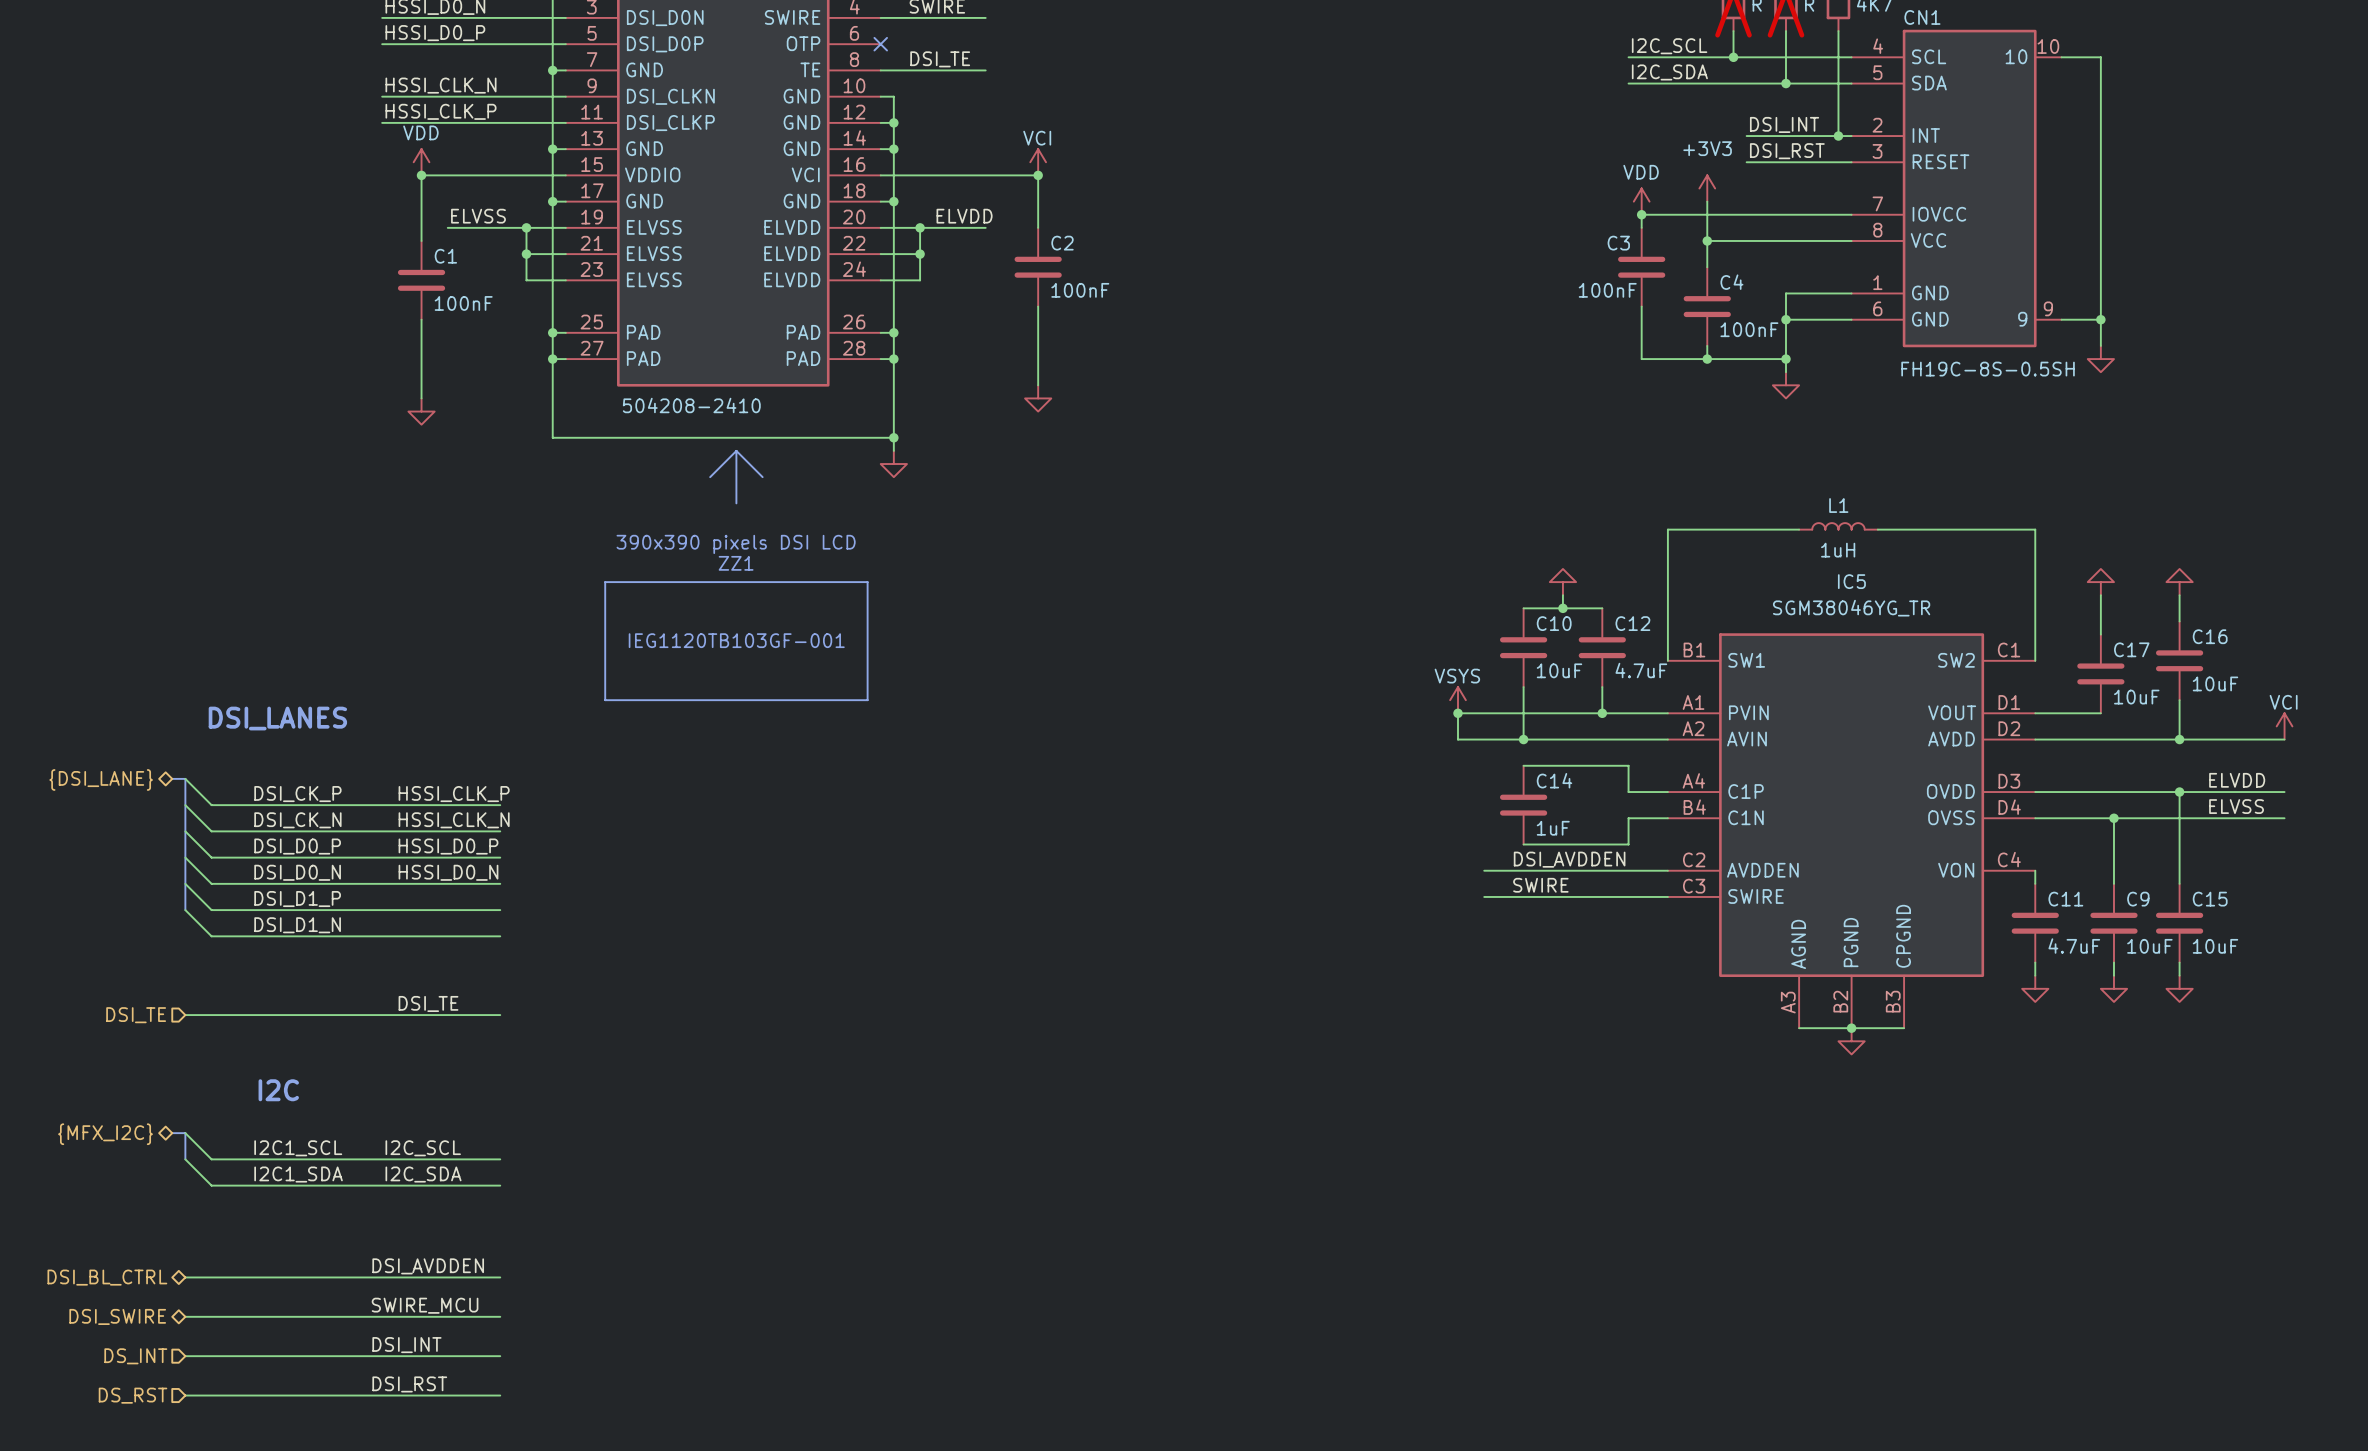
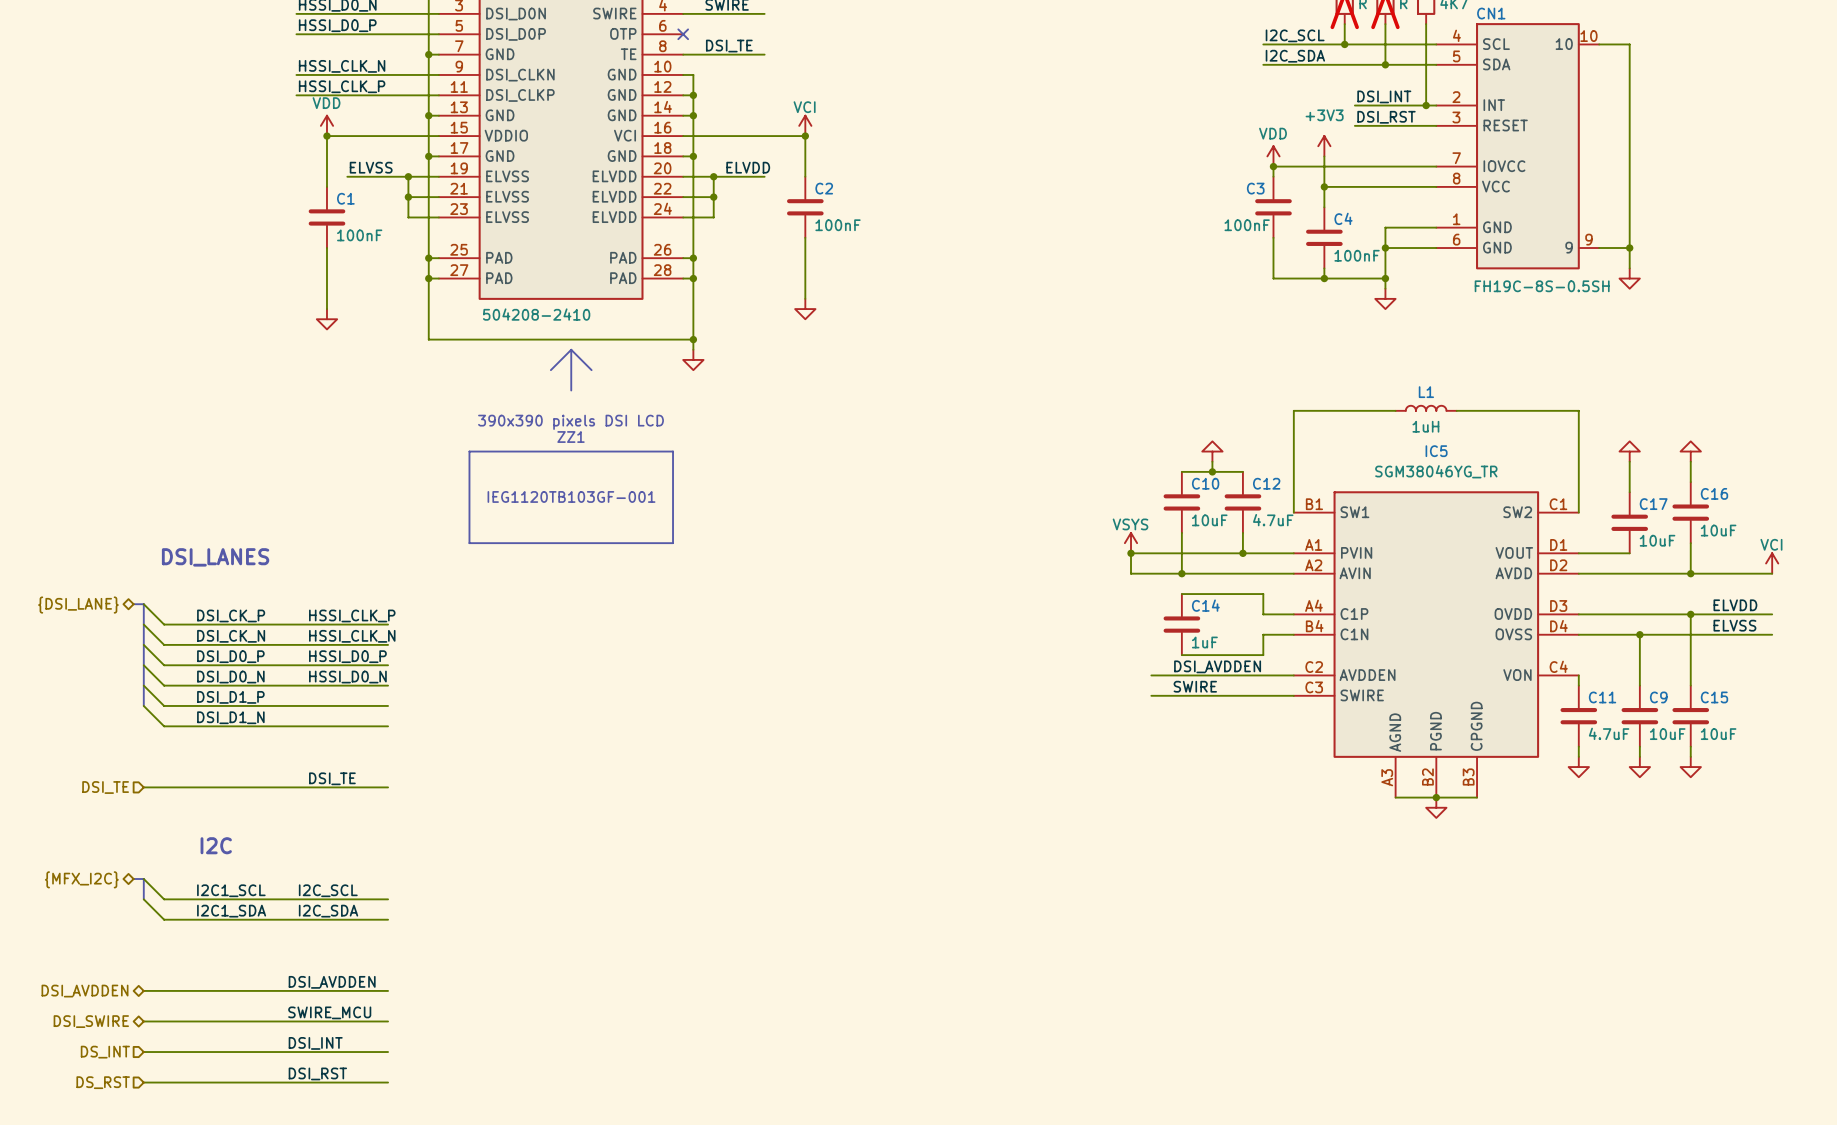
hierarchical label: DSI_BL_CTRL (107, 1277) -> DSI_AVDDEN (85, 991)

